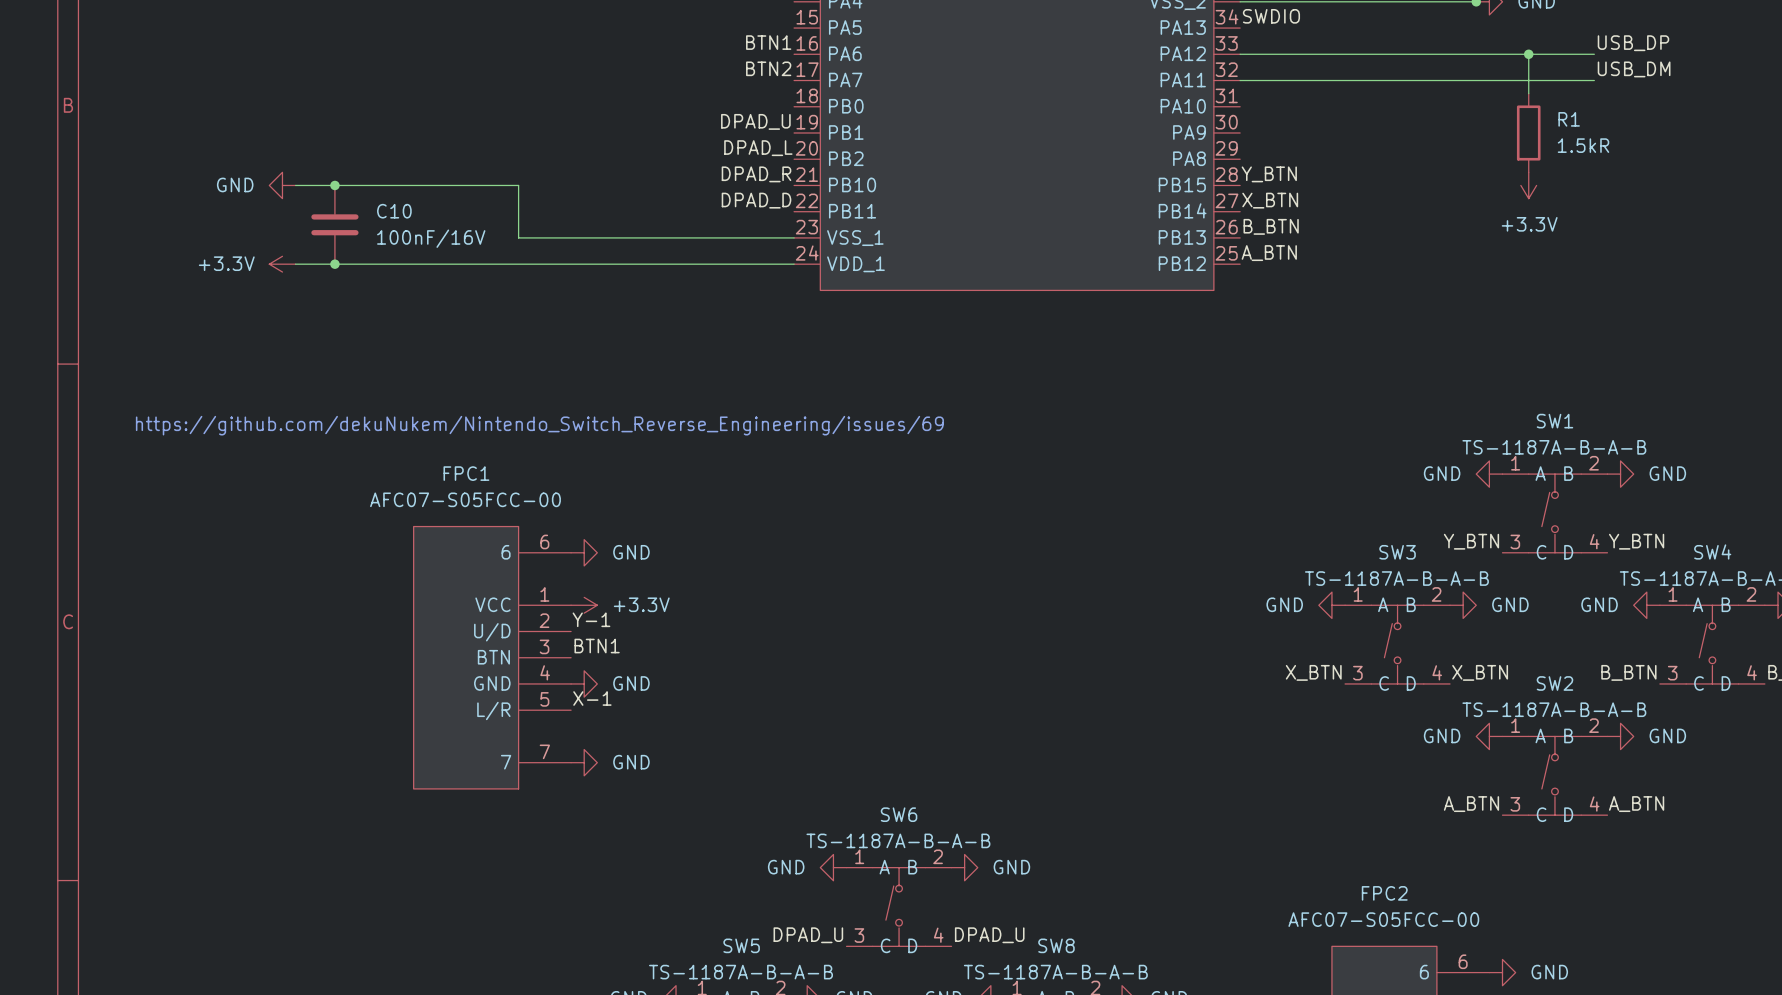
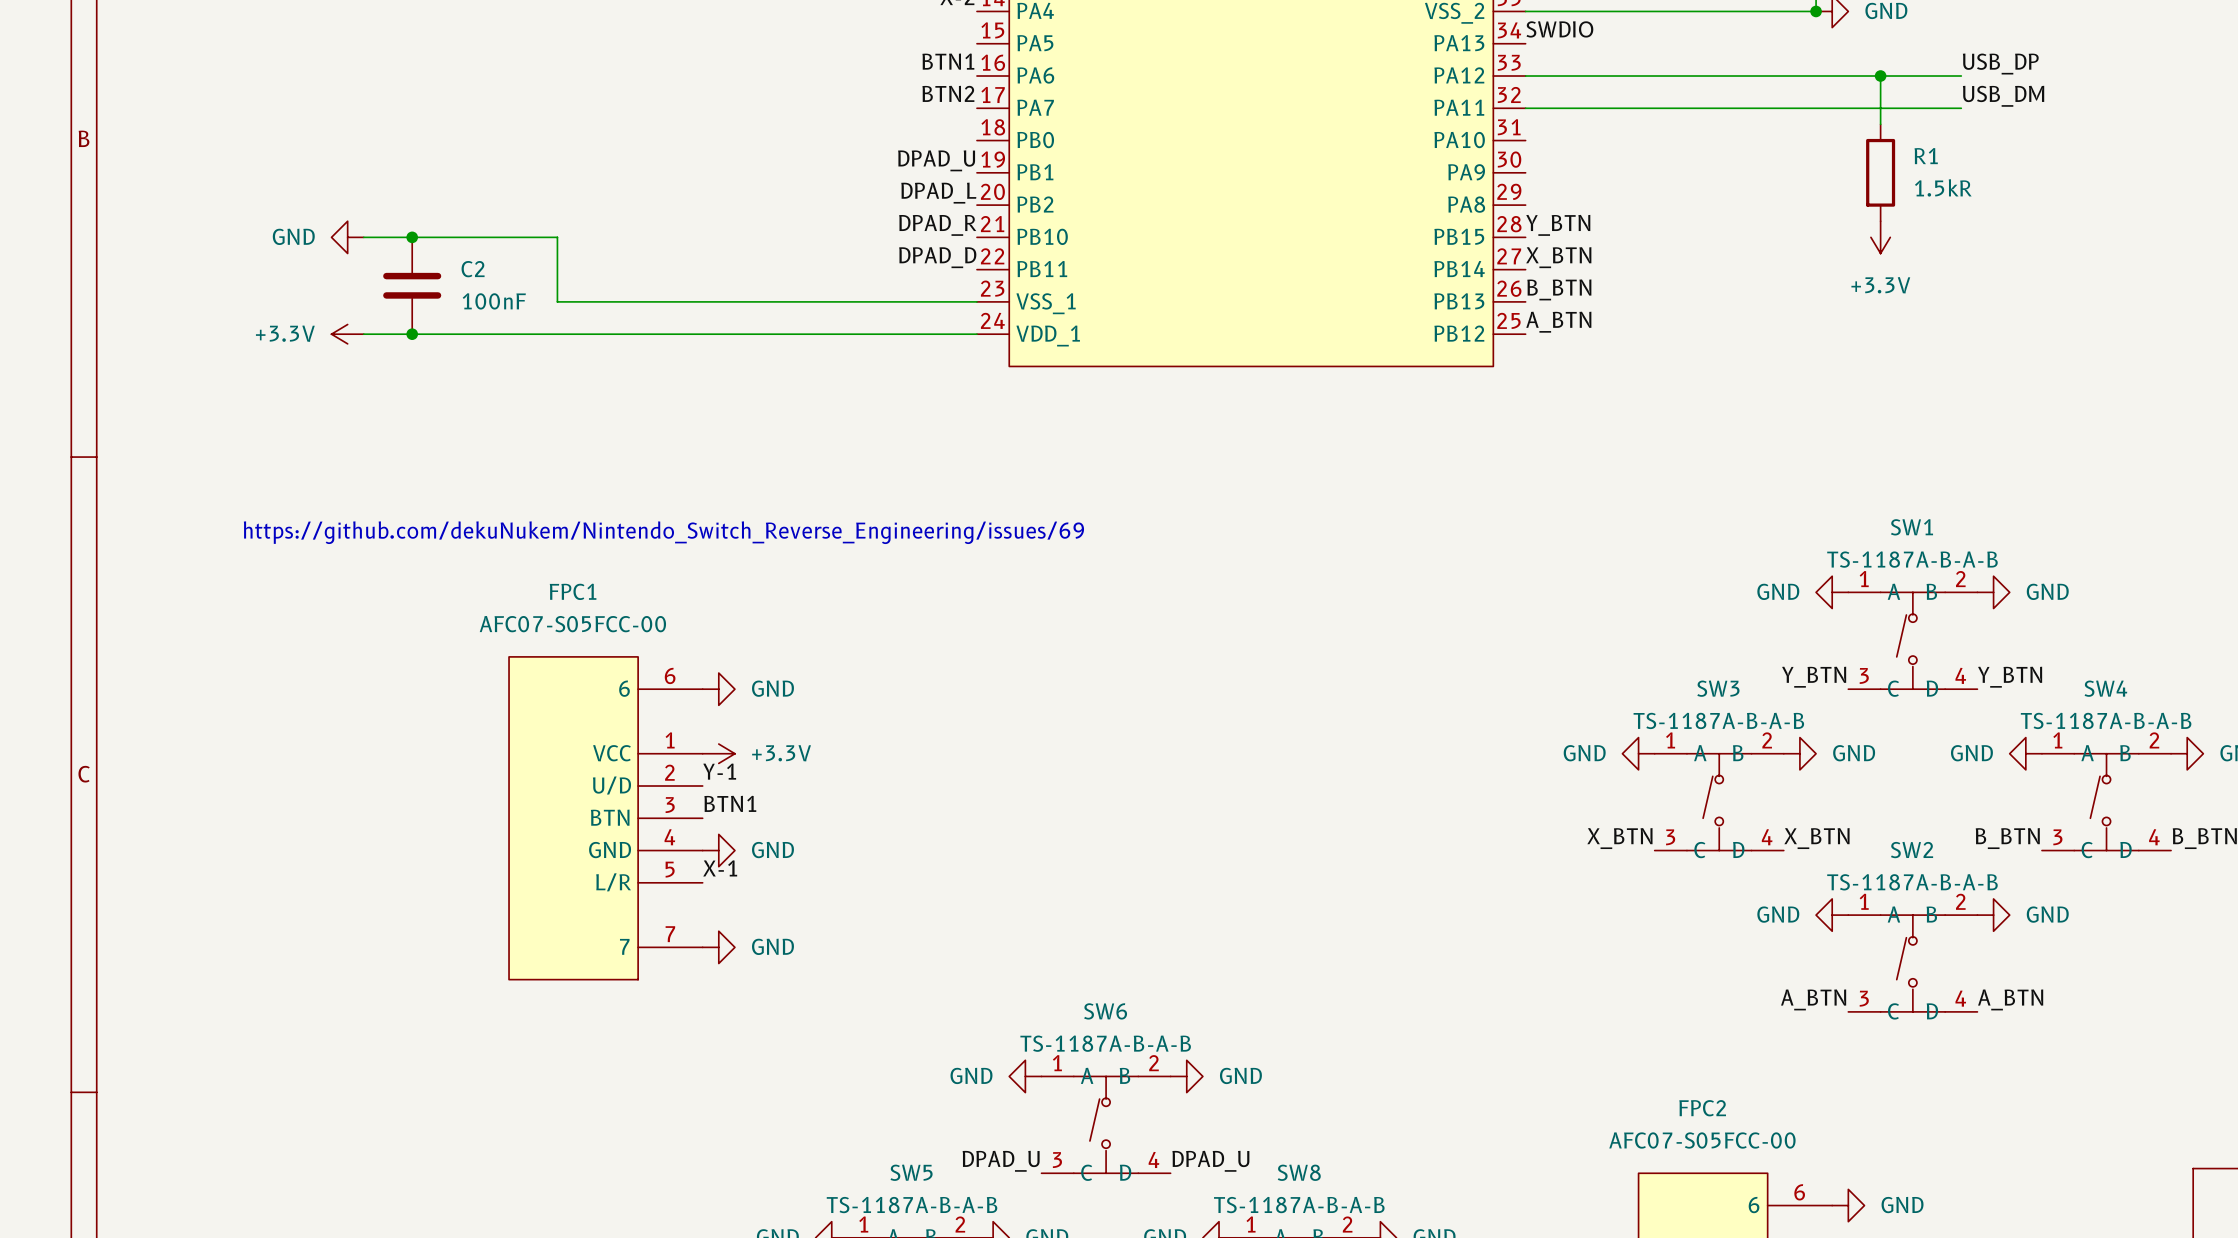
wire: (453, 185) (518, 185) (518, 237) -> (557, 237) (557, 301) (638, 301)
C10 name: C10 (394, 211) -> C2 (473, 269)
C10 value: 100nF/16V (431, 238) -> 100nF (494, 301)

